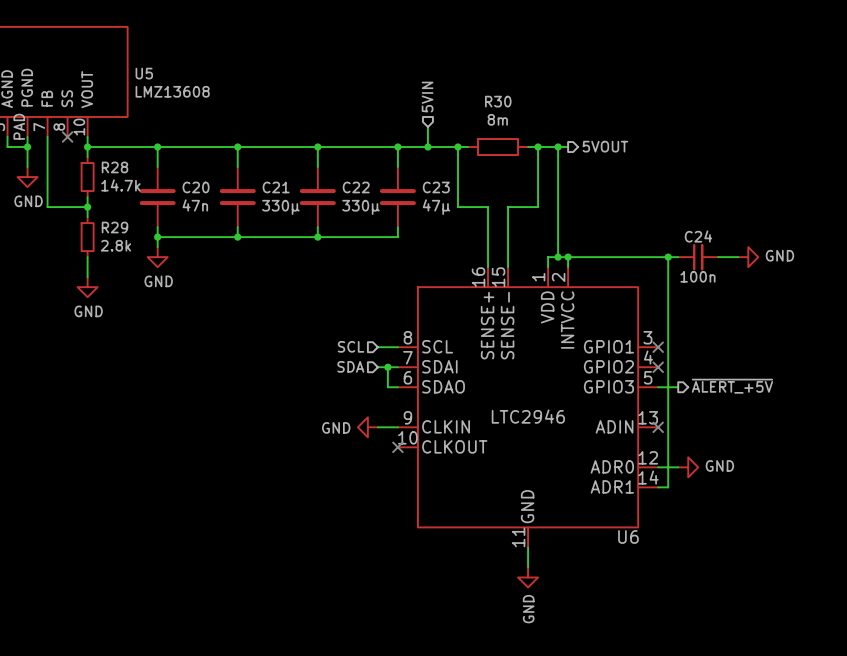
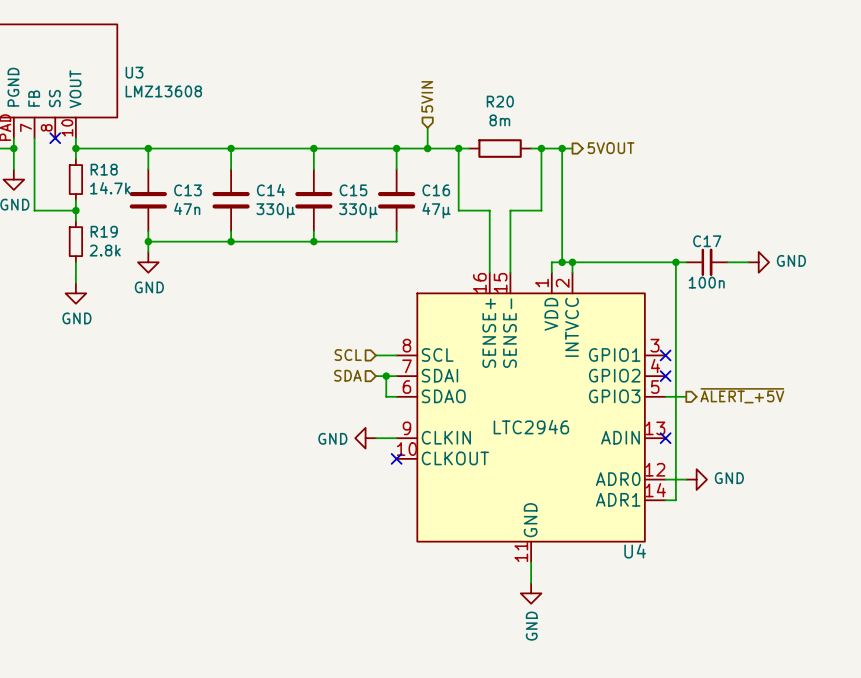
U5 name: U5 (144, 73) -> U3 (134, 72)
R30 name: R30 (498, 101) -> R20 (500, 101)
R28 name: R28 (114, 167) -> R18 (104, 169)
C20 name: C20 (196, 187) -> C13 (187, 190)
C21 name: C21 (276, 187) -> C14 (270, 190)
C22 name: C22 (356, 187) -> C15 (353, 190)
C23 name: C23 (436, 187) -> C16 (436, 190)
R29 name: R29 (114, 227) -> R19 (104, 231)
C24 name: C24 (698, 236) -> C17 (707, 241)
U6 name: U6 (628, 536) -> U4 (635, 551)

